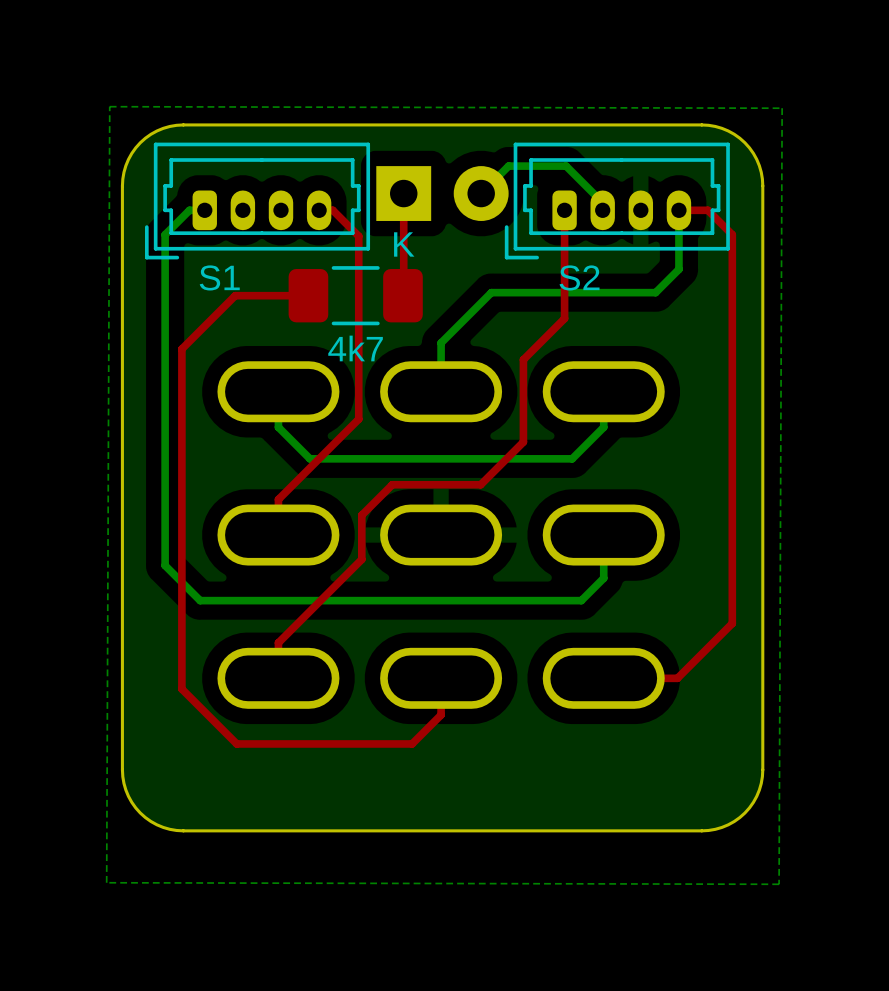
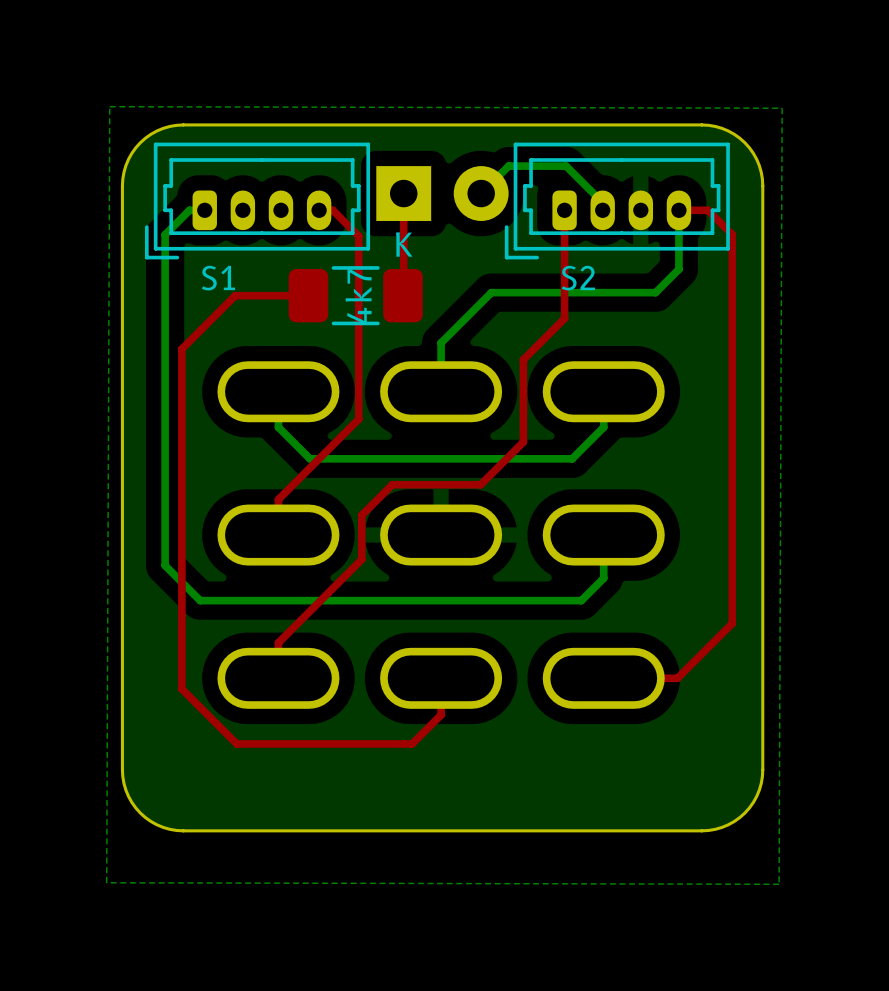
part value rotation: 0° (355, 348) -> 90° counterclockwise (358, 296)

